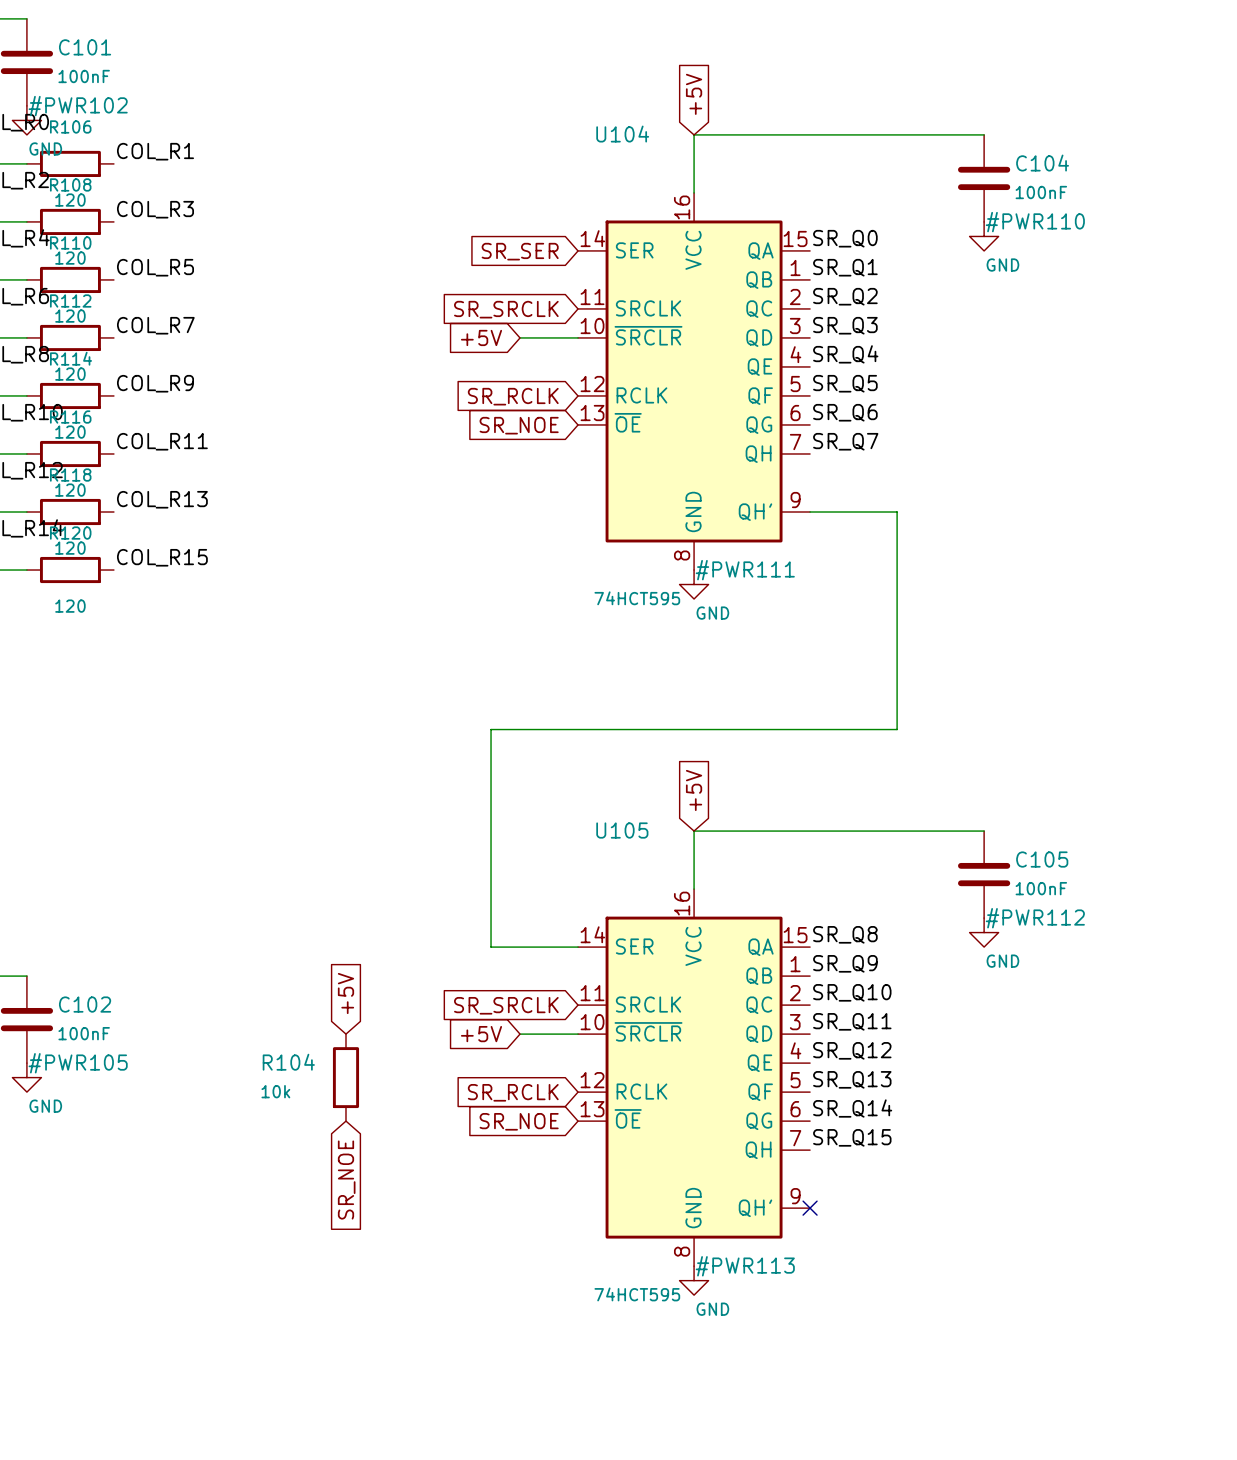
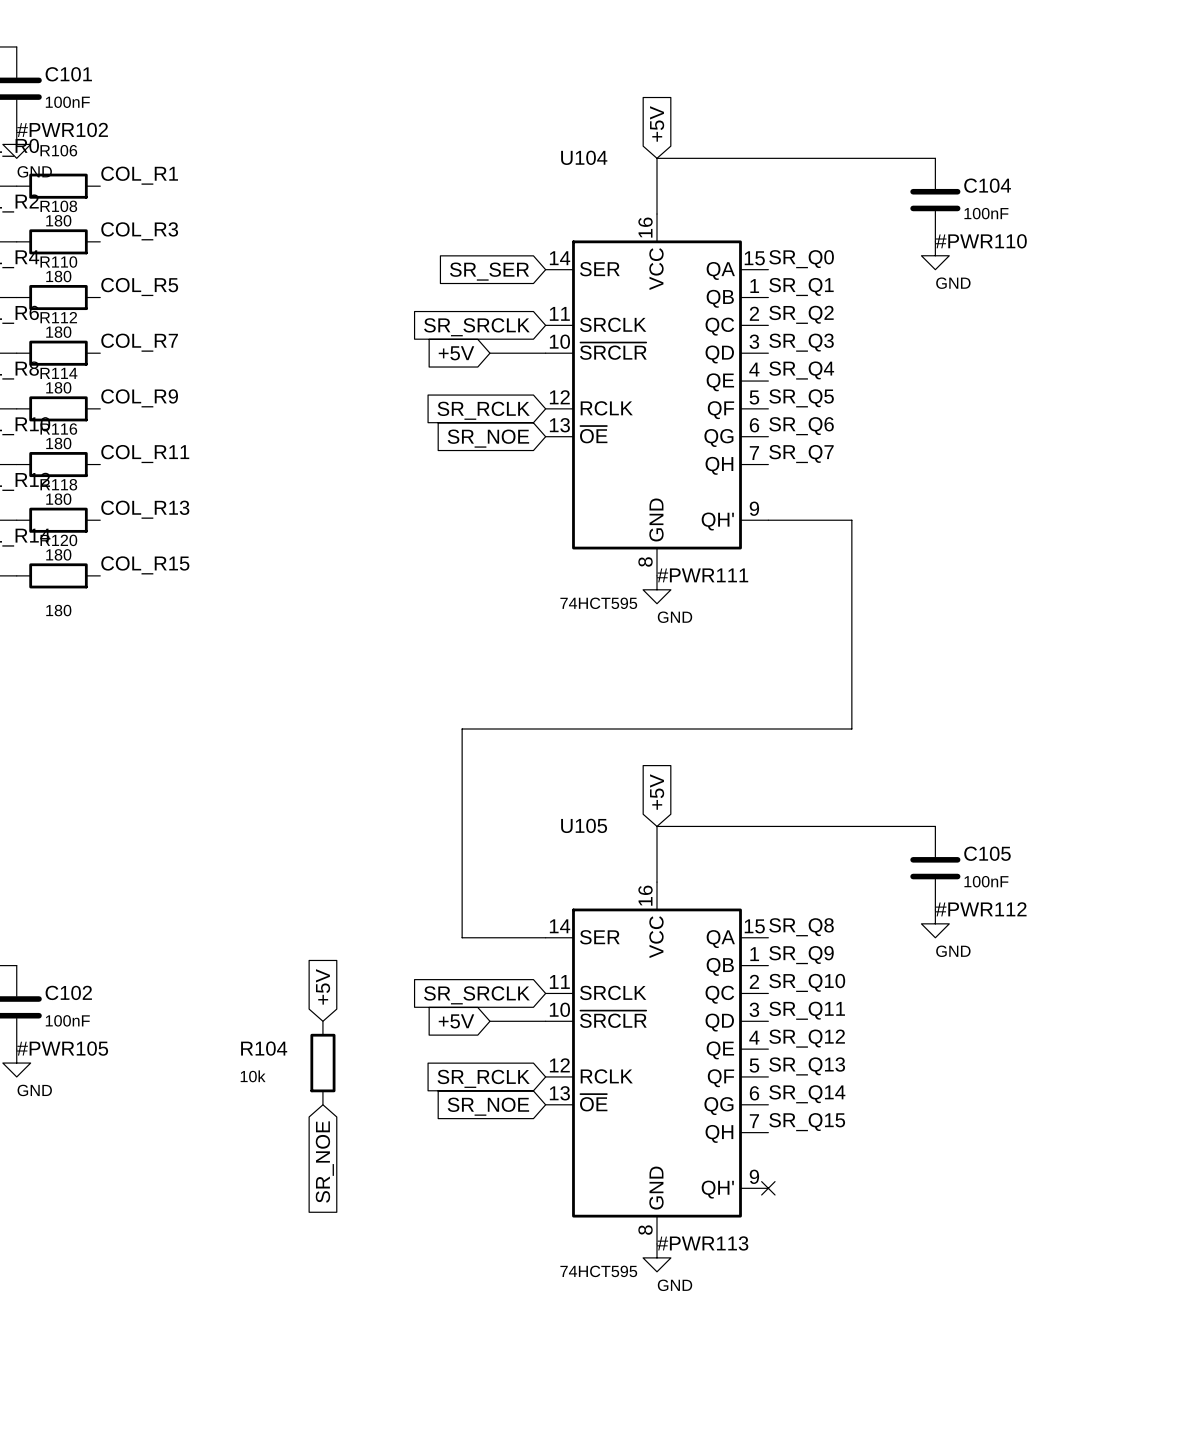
R106 value: 120 (70, 200) -> 180 (58, 220)
R108 value: 120 (70, 258) -> 180 (58, 276)
R110 value: 120 (70, 316) -> 180 (58, 332)
R112 value: 120 (70, 374) -> 180 (58, 387)
R114 value: 120 (70, 432) -> 180 (58, 443)
R116 value: 120 (70, 490) -> 180 (58, 499)
R118 value: 120 (70, 548) -> 180 (58, 554)
R120 value: 120 (70, 606) -> 180 (58, 610)

